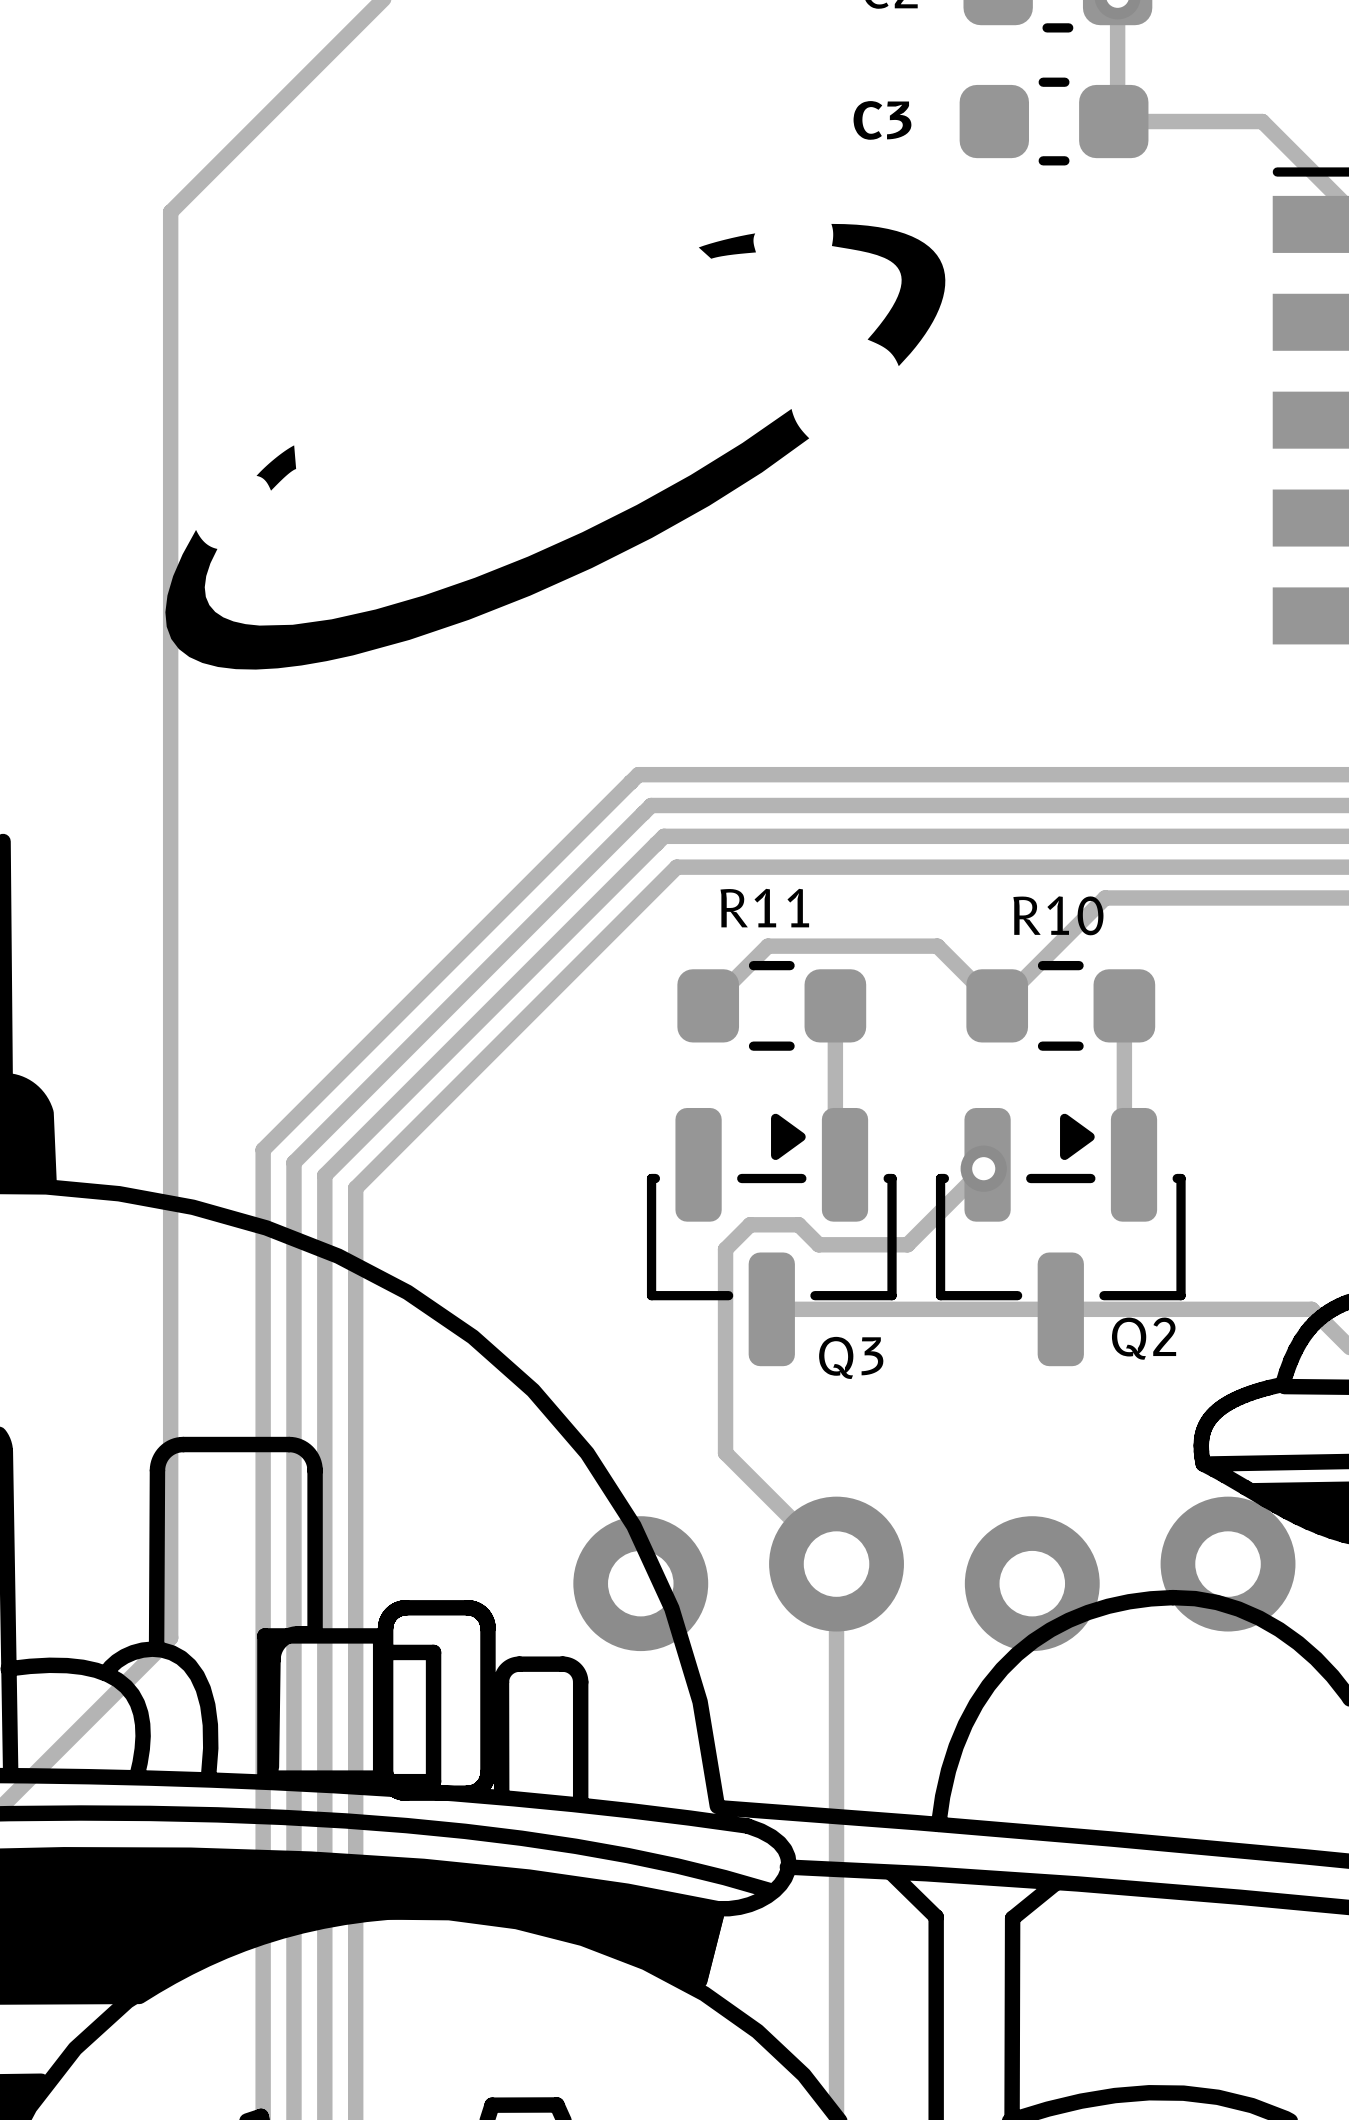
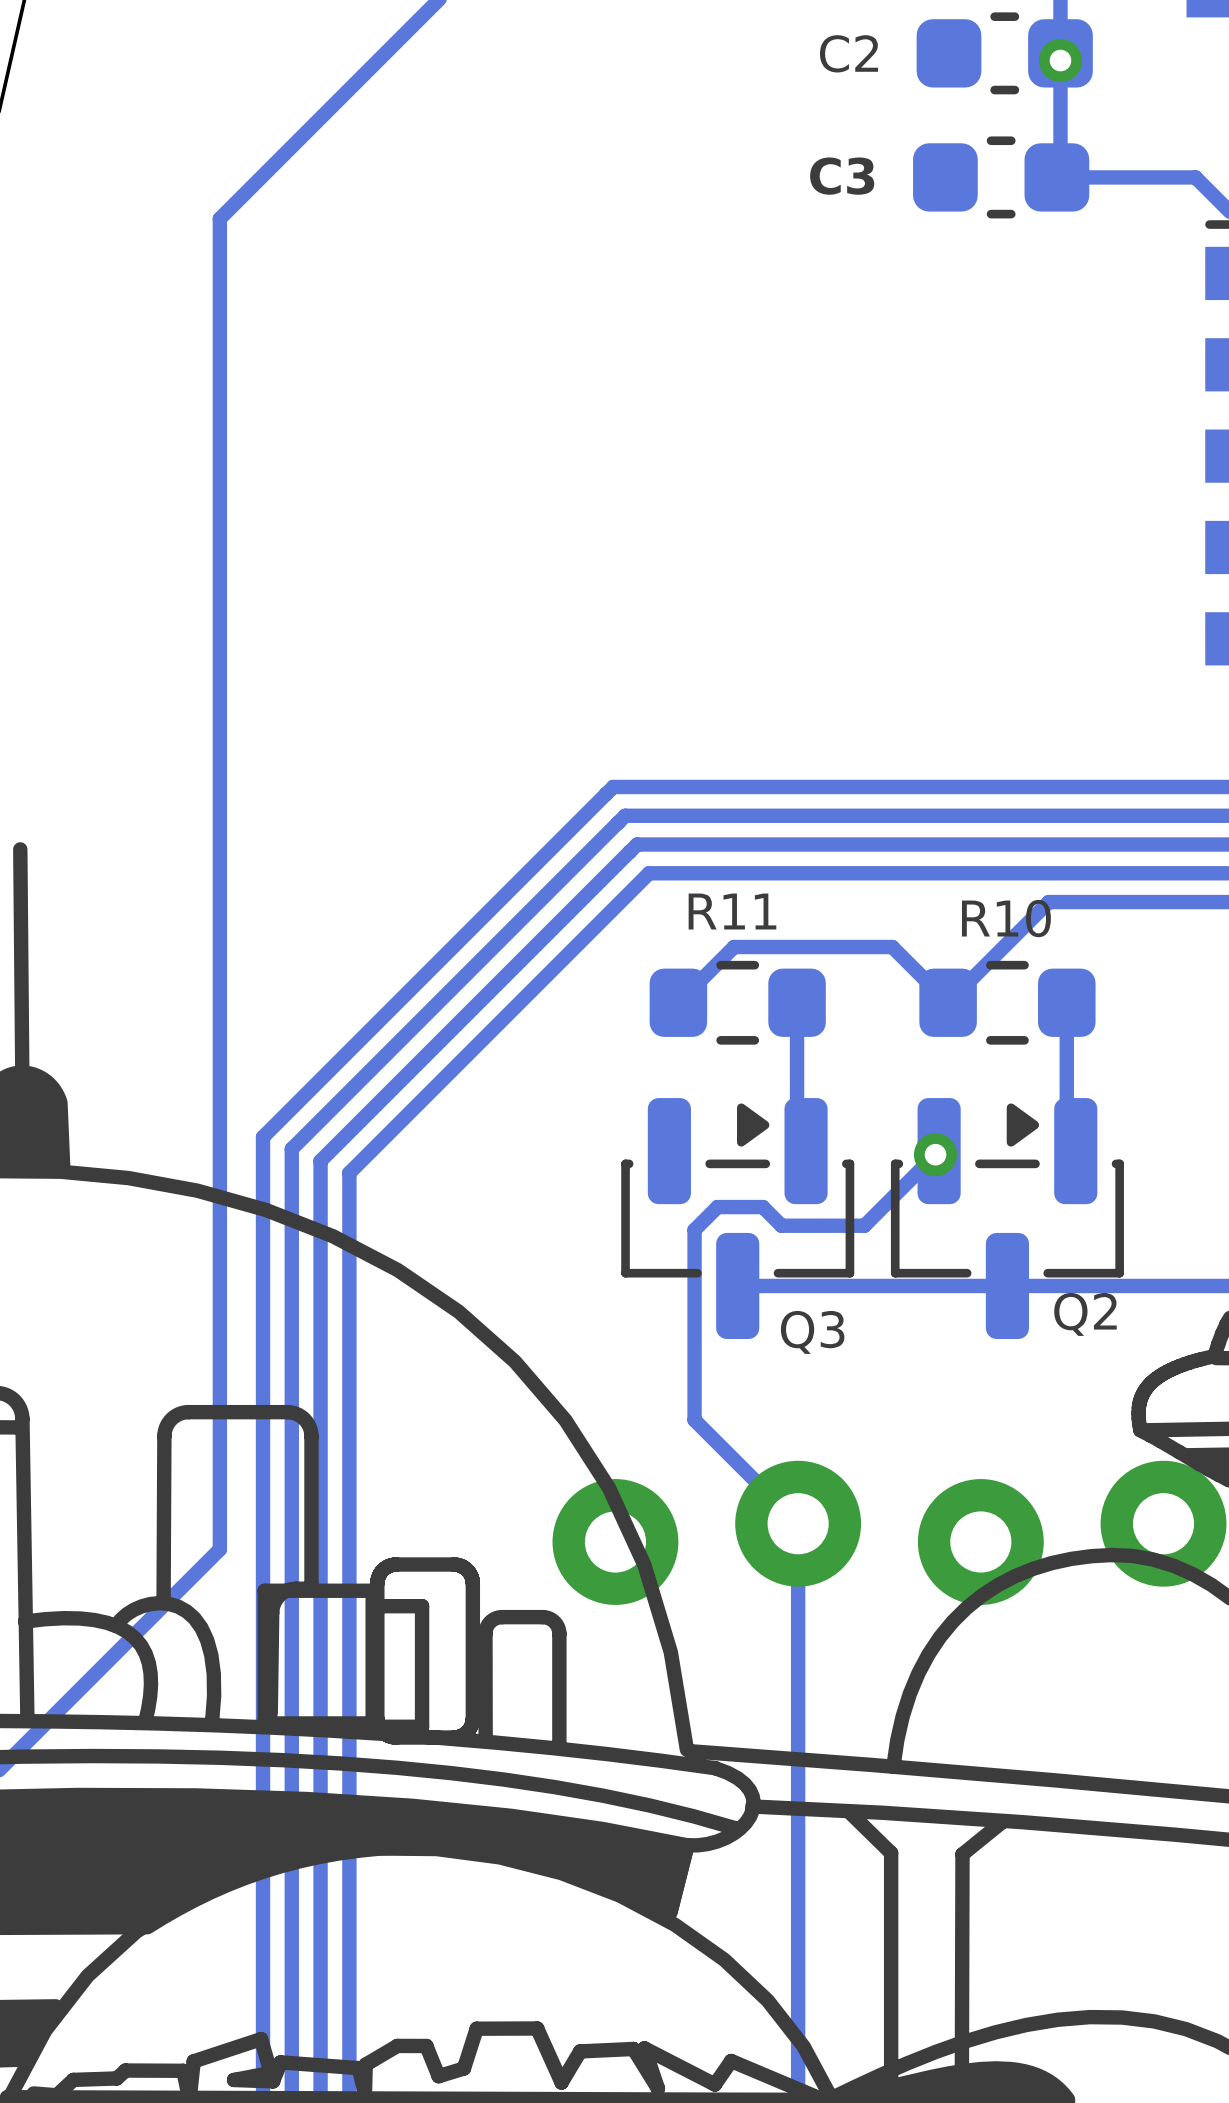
track: (216, 165) (170, 212) (170, 1637) -> (219, 218) (219, 1549) (176, 1592)
drawing: [165, 223, 946, 670] -> none

